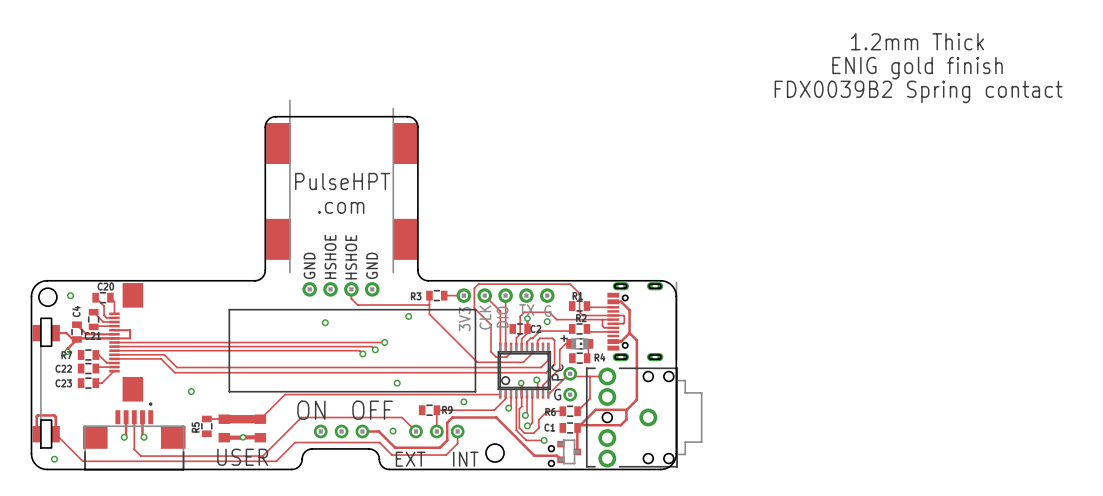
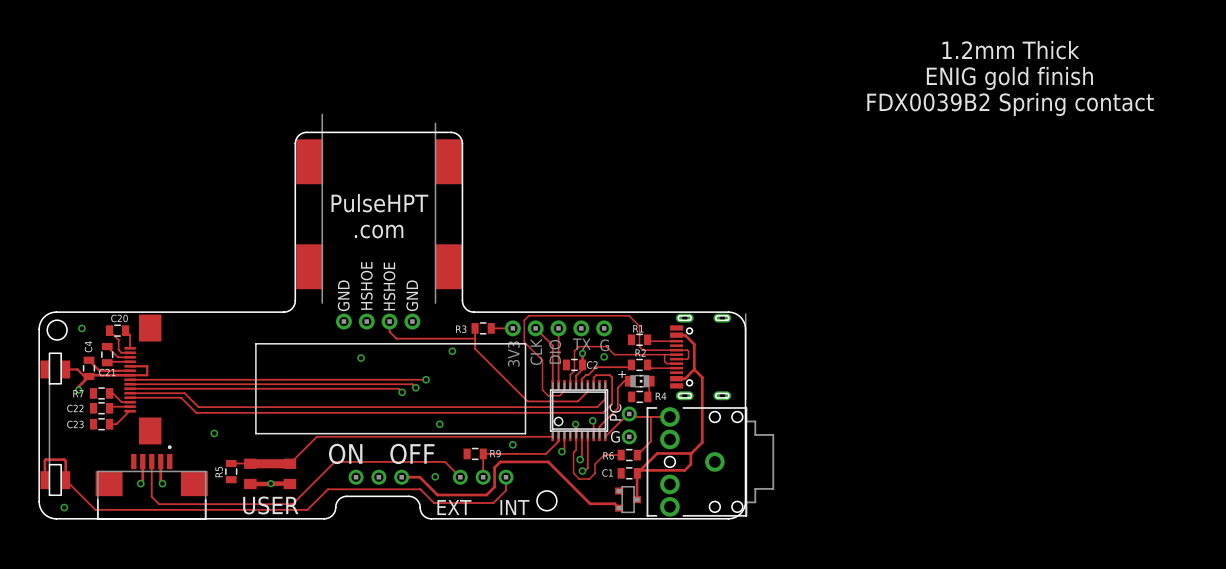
track: (516, 394) (516, 430) (526, 440) (544, 440) -> none
via: (544, 440) -> none
part: (551, 456) -> none

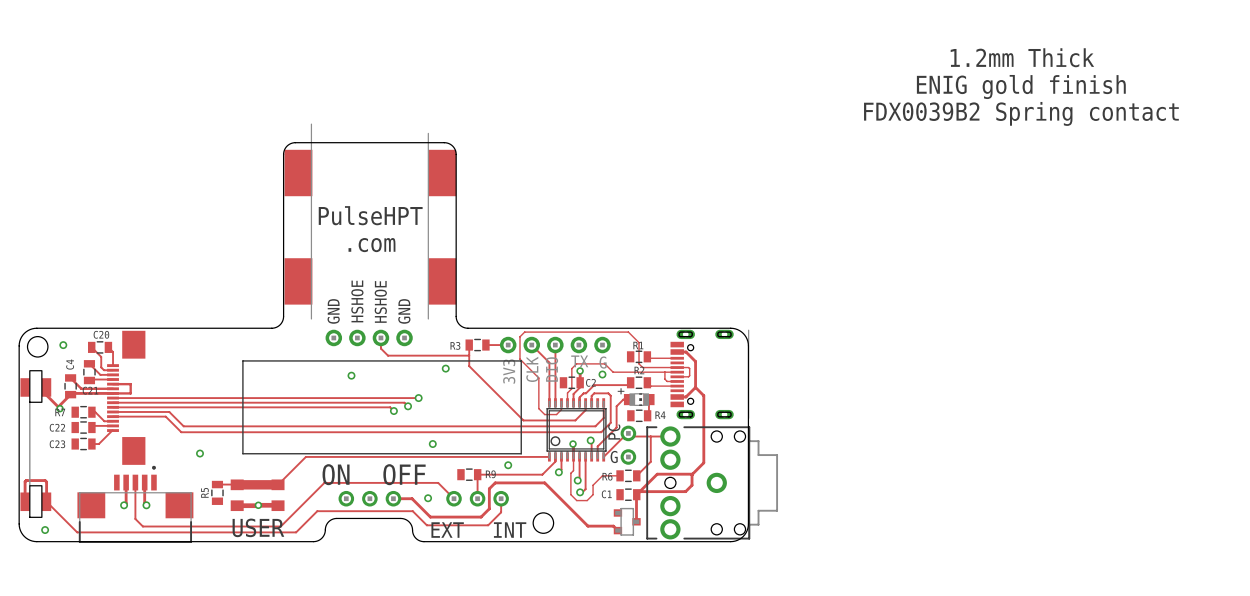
track: (65, 369) (77, 369) (84, 376) (89, 376) -> none
track: none -> (46, 395) (59, 408)

